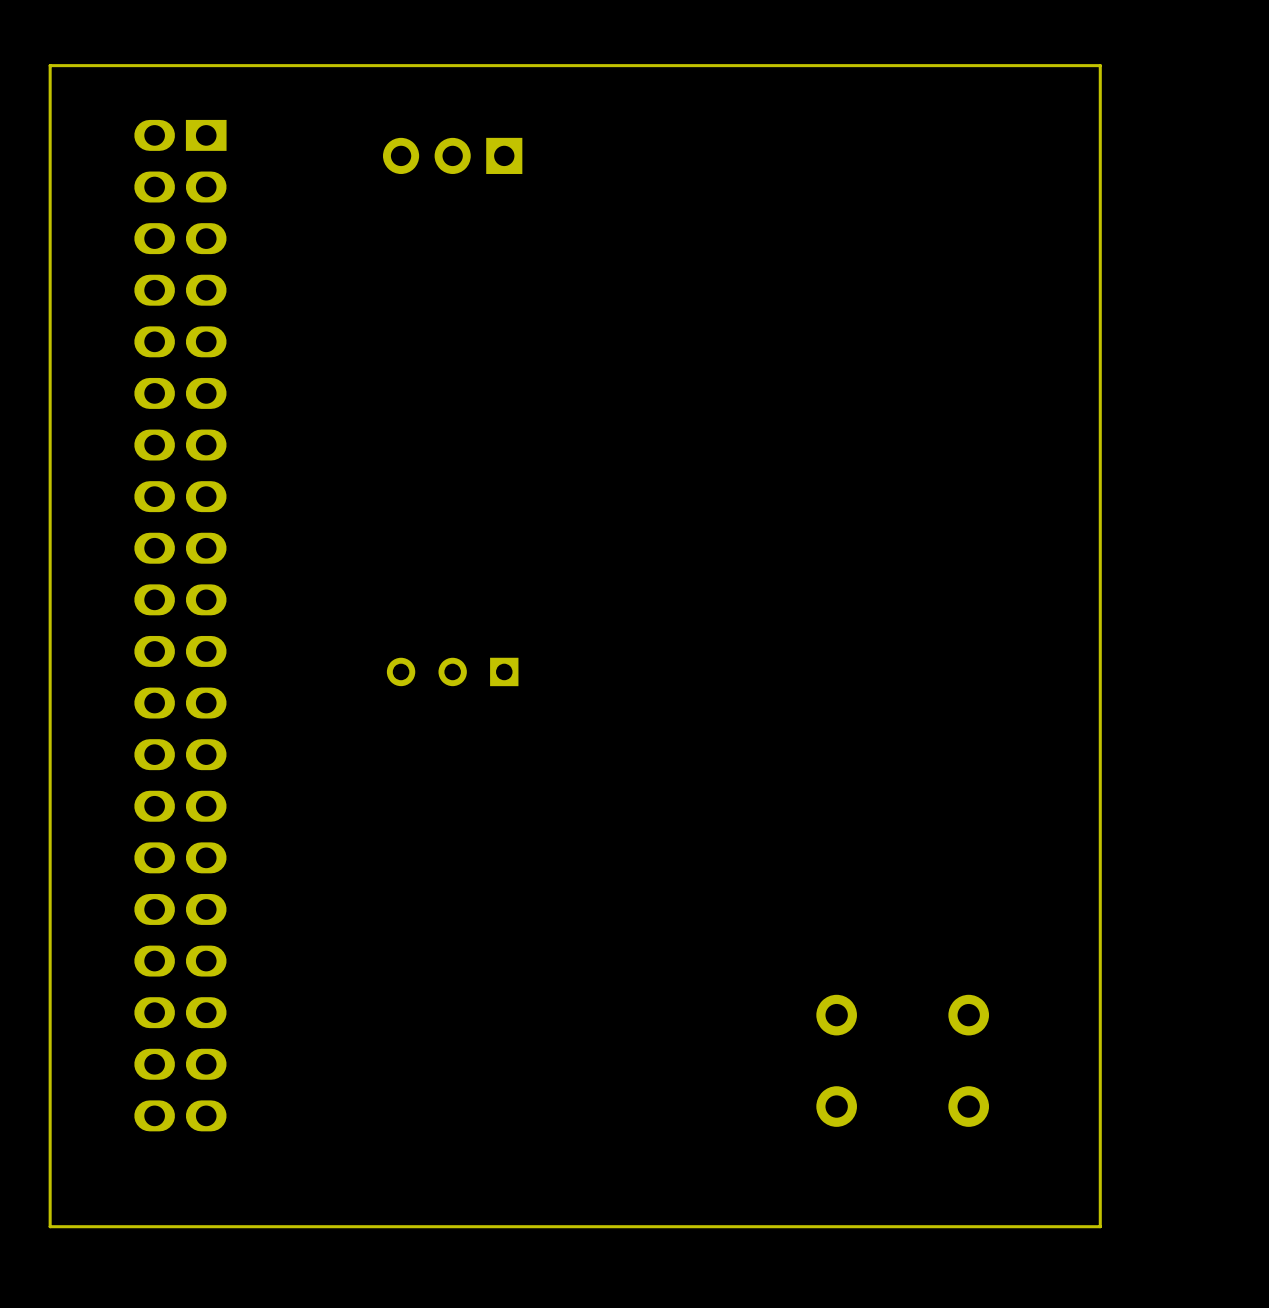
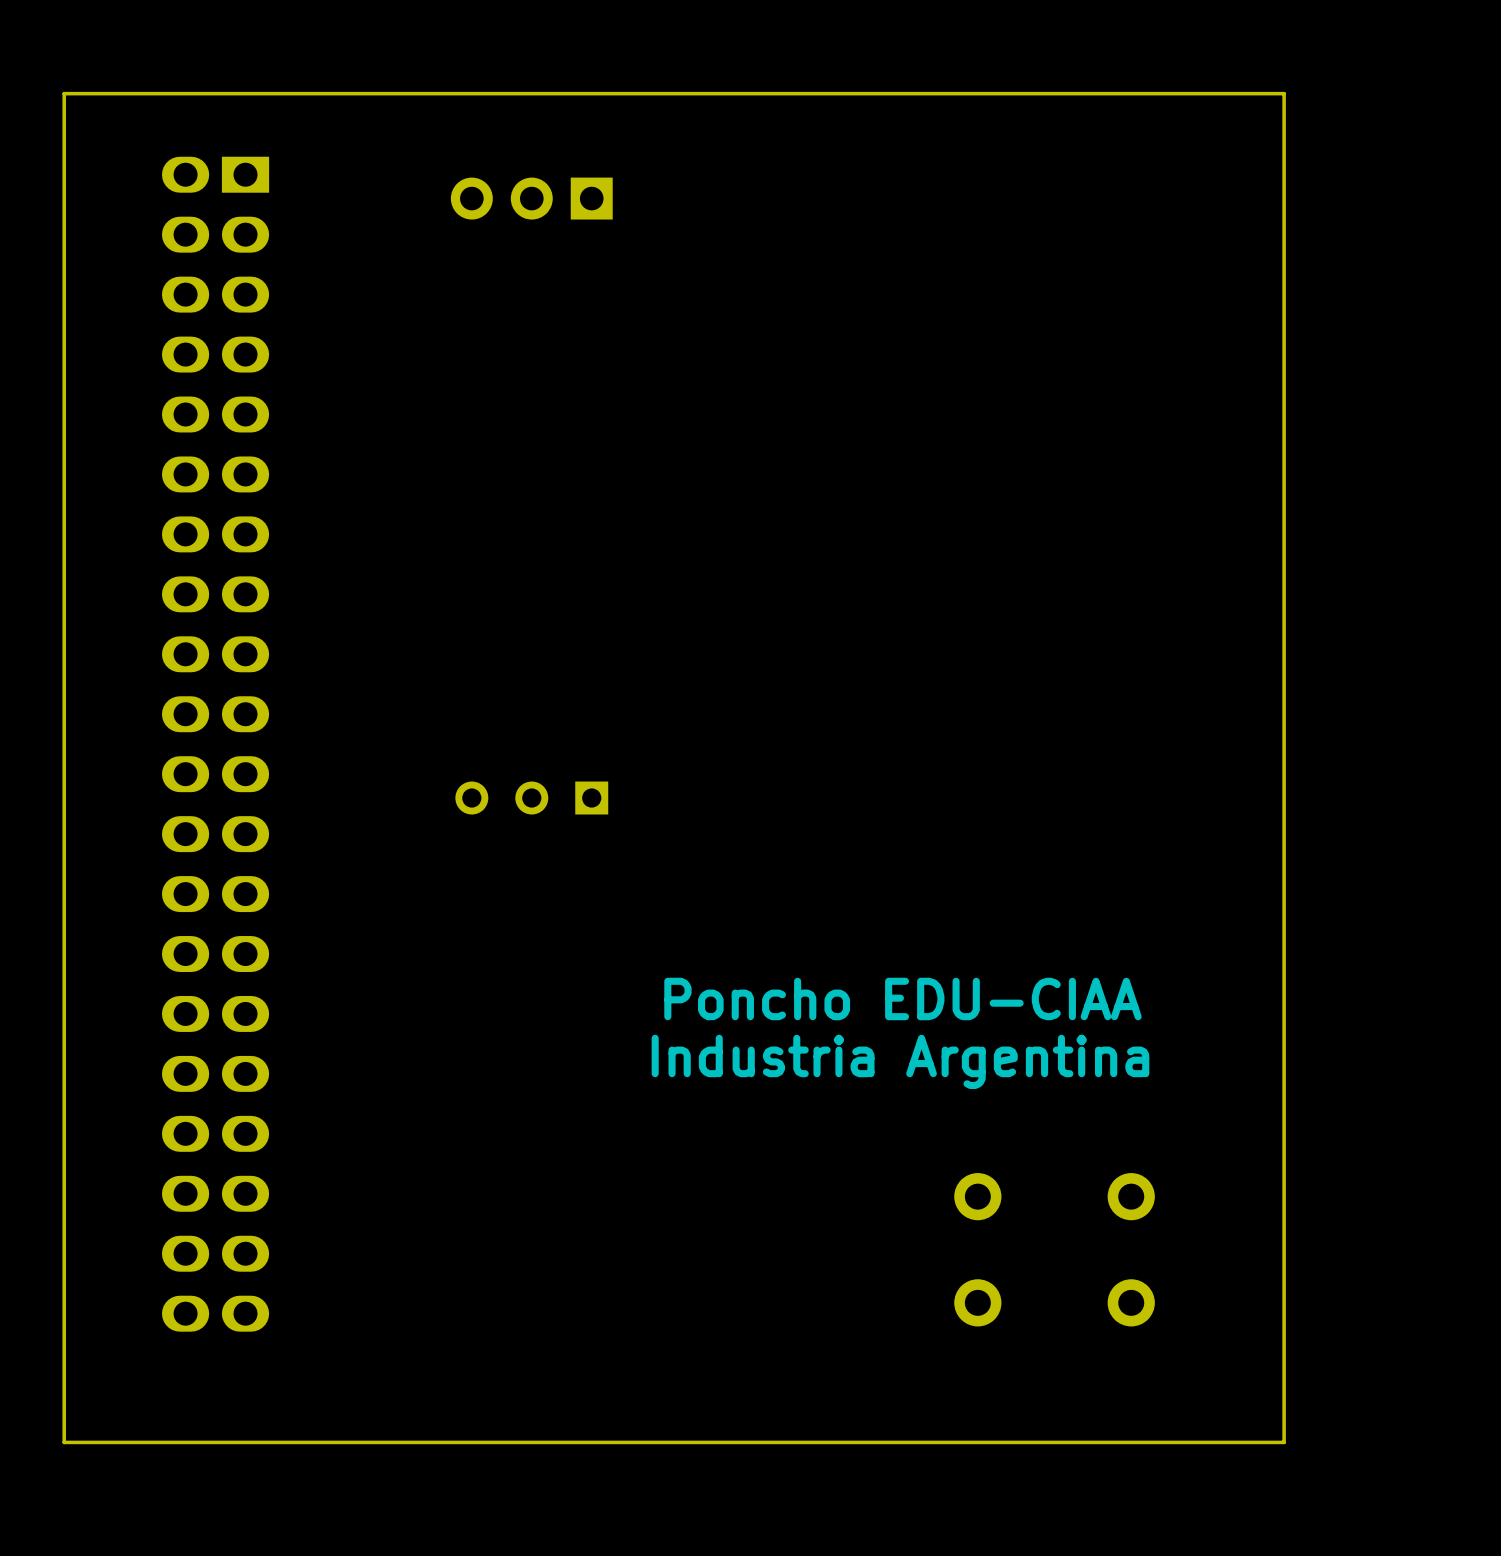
text: none -> Poncho EDU-CIAA (902, 998)
text: none -> Industria Argentina (900, 1061)

